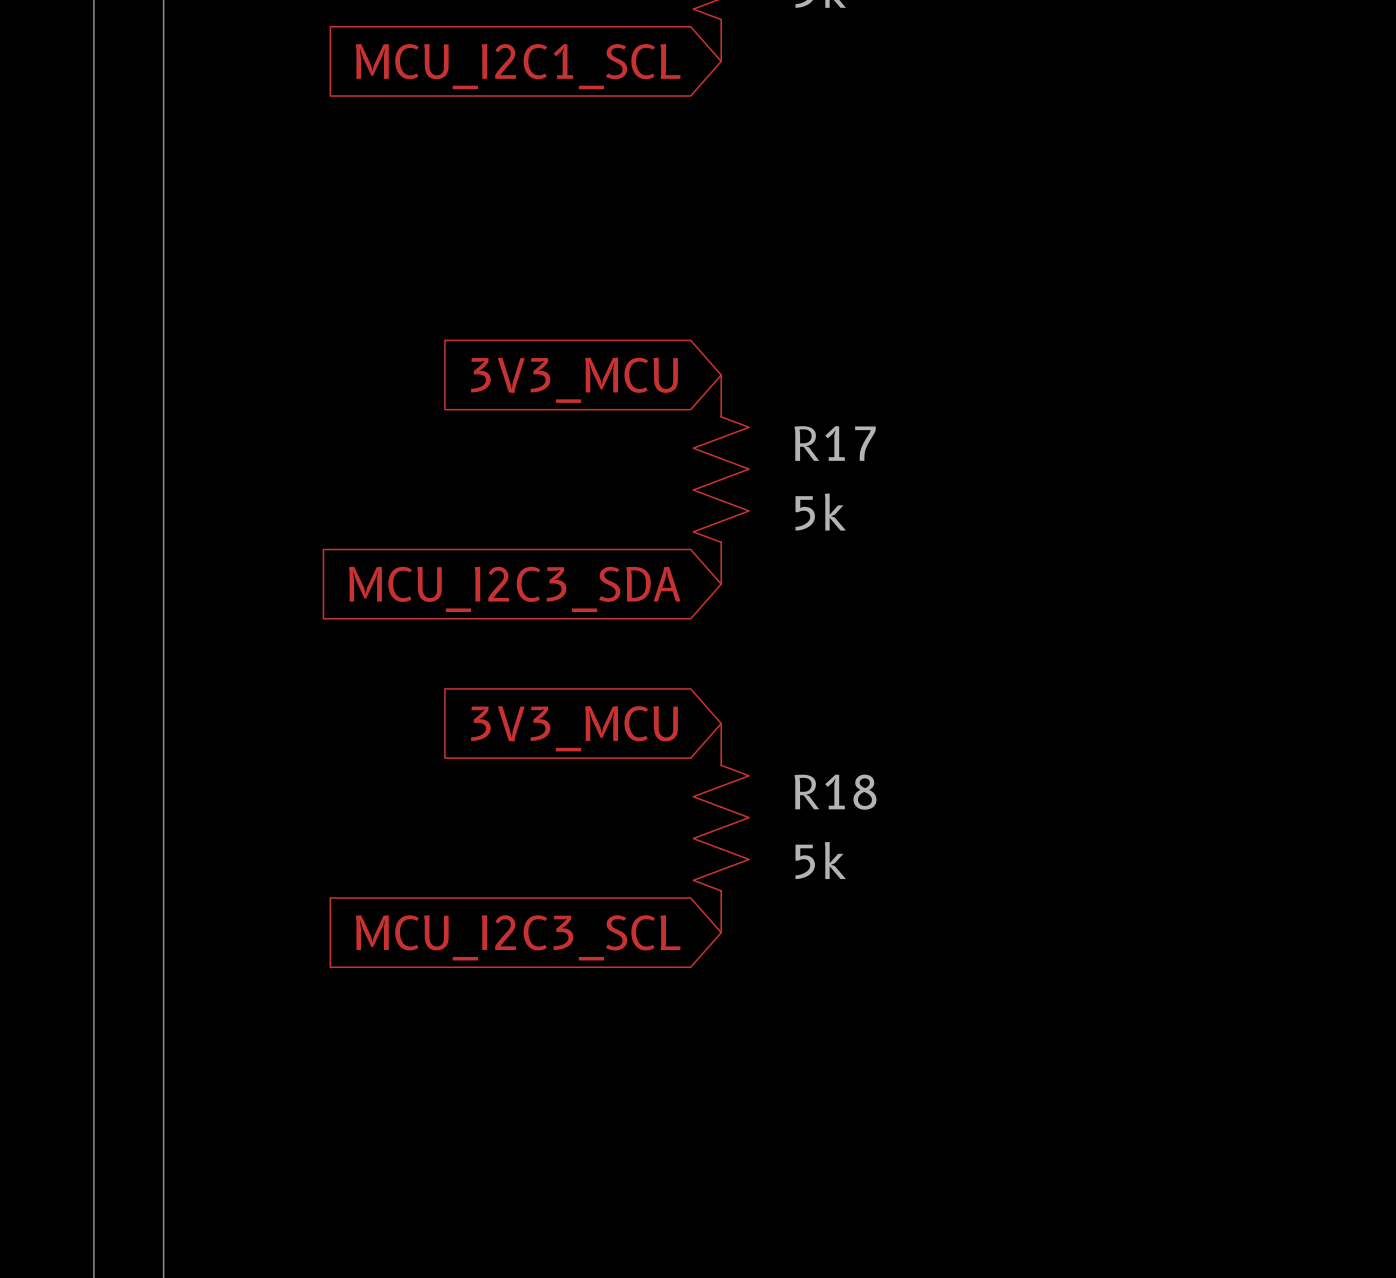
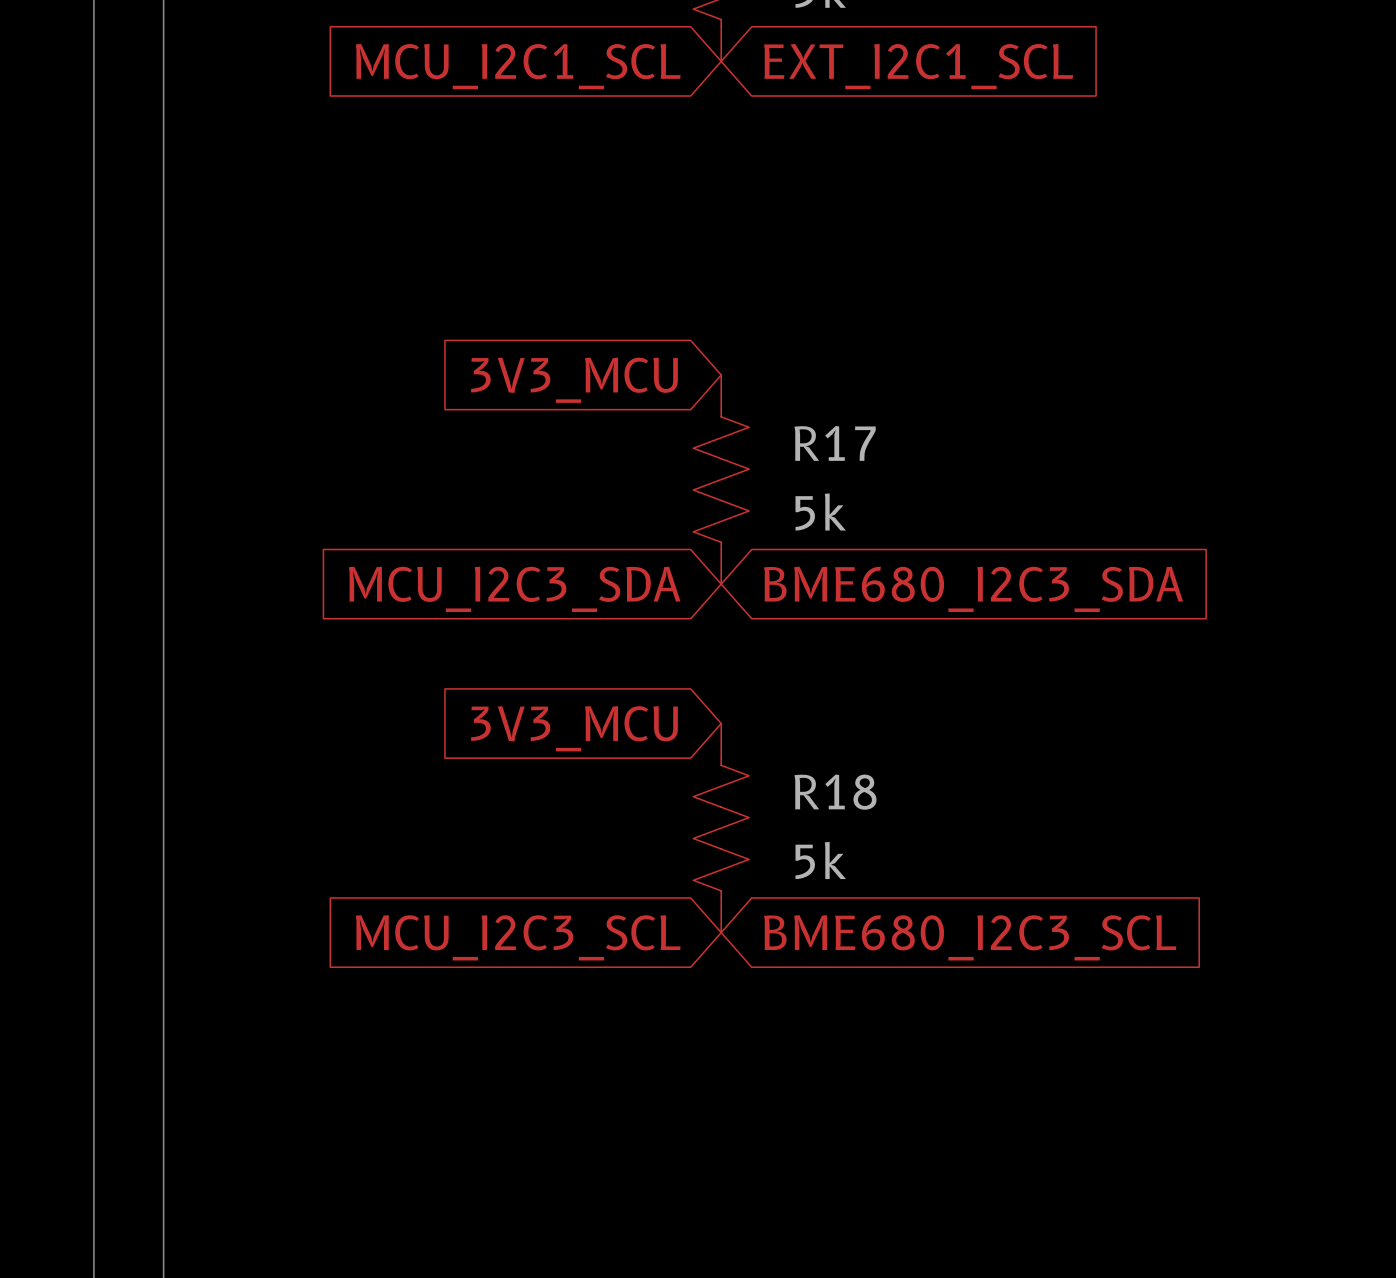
global label: none -> EXT_I2C1_SCL (918, 66)
global label: none -> BME680_I2C3_SDA (973, 589)
global label: none -> BME680_I2C3_SCL (970, 937)

